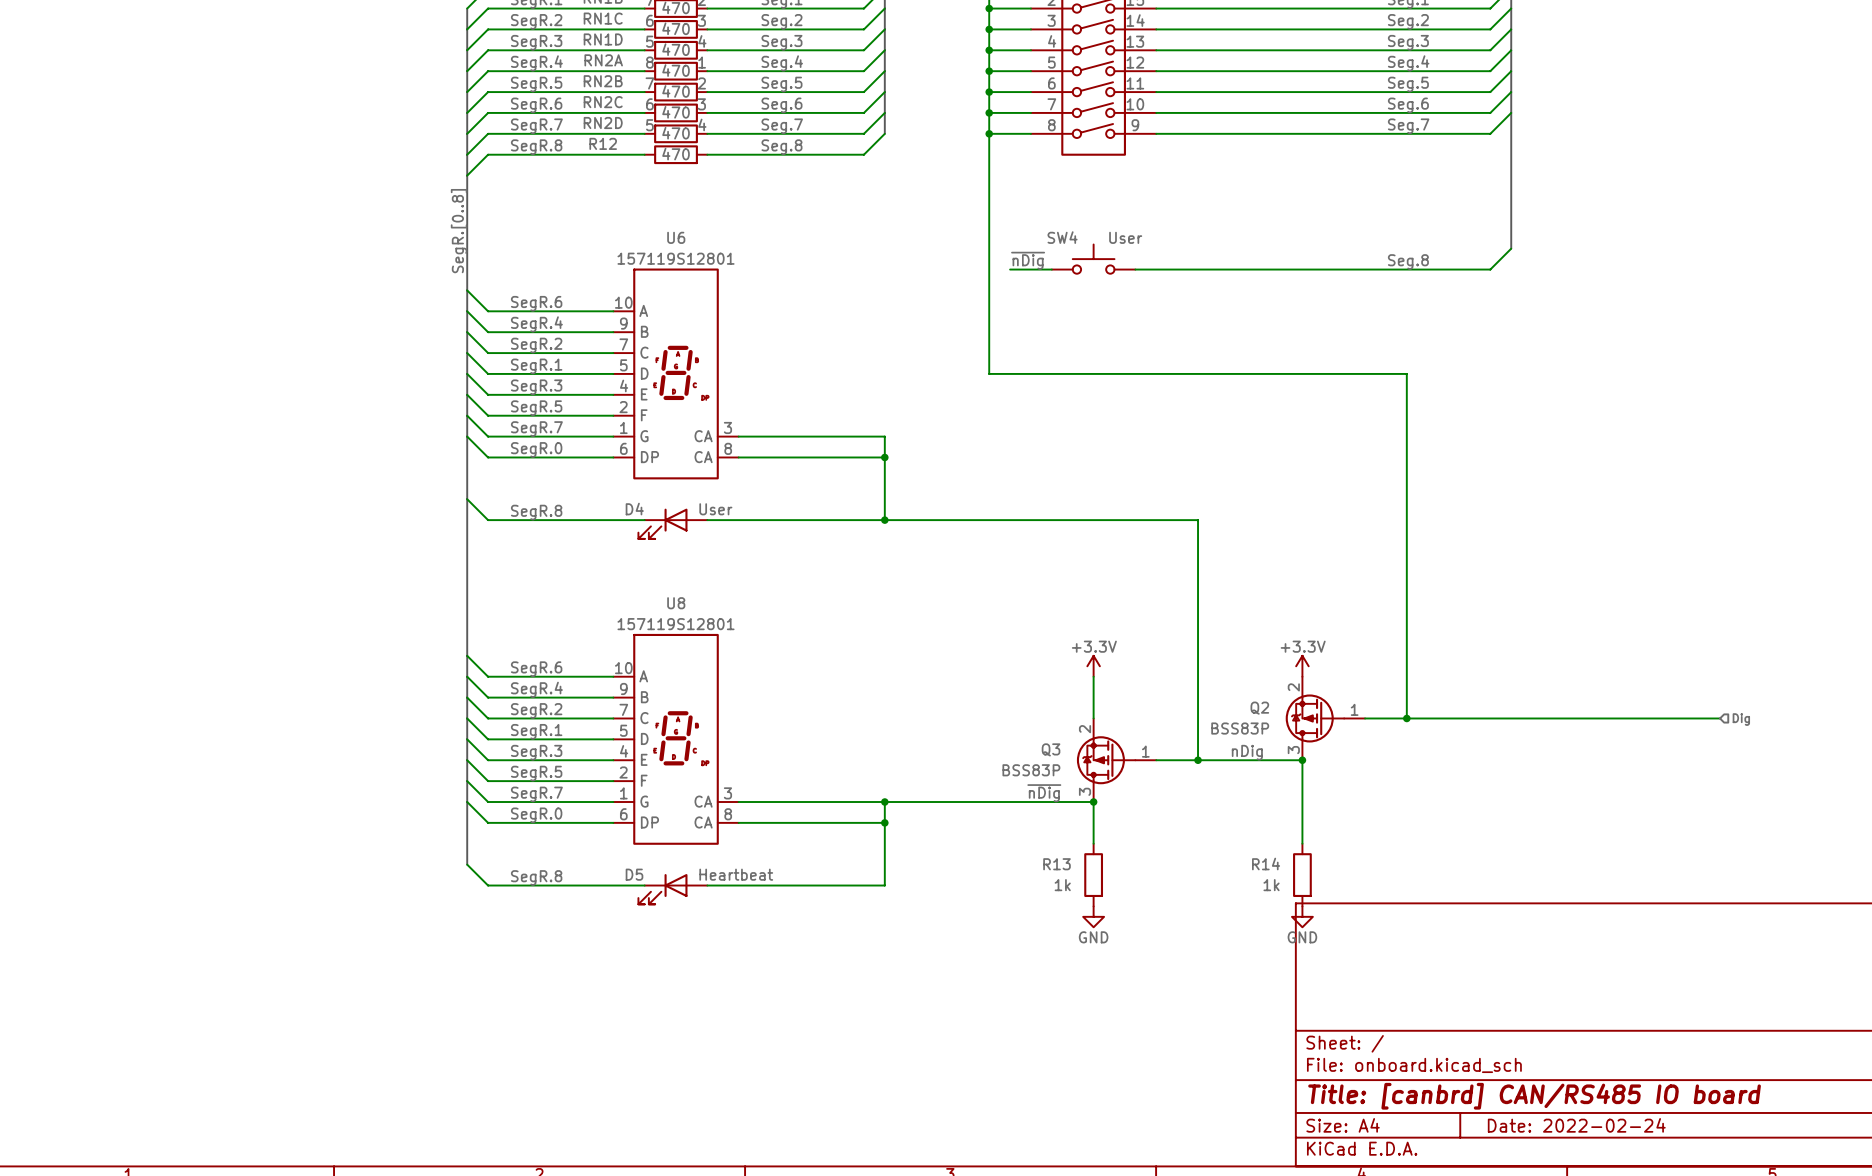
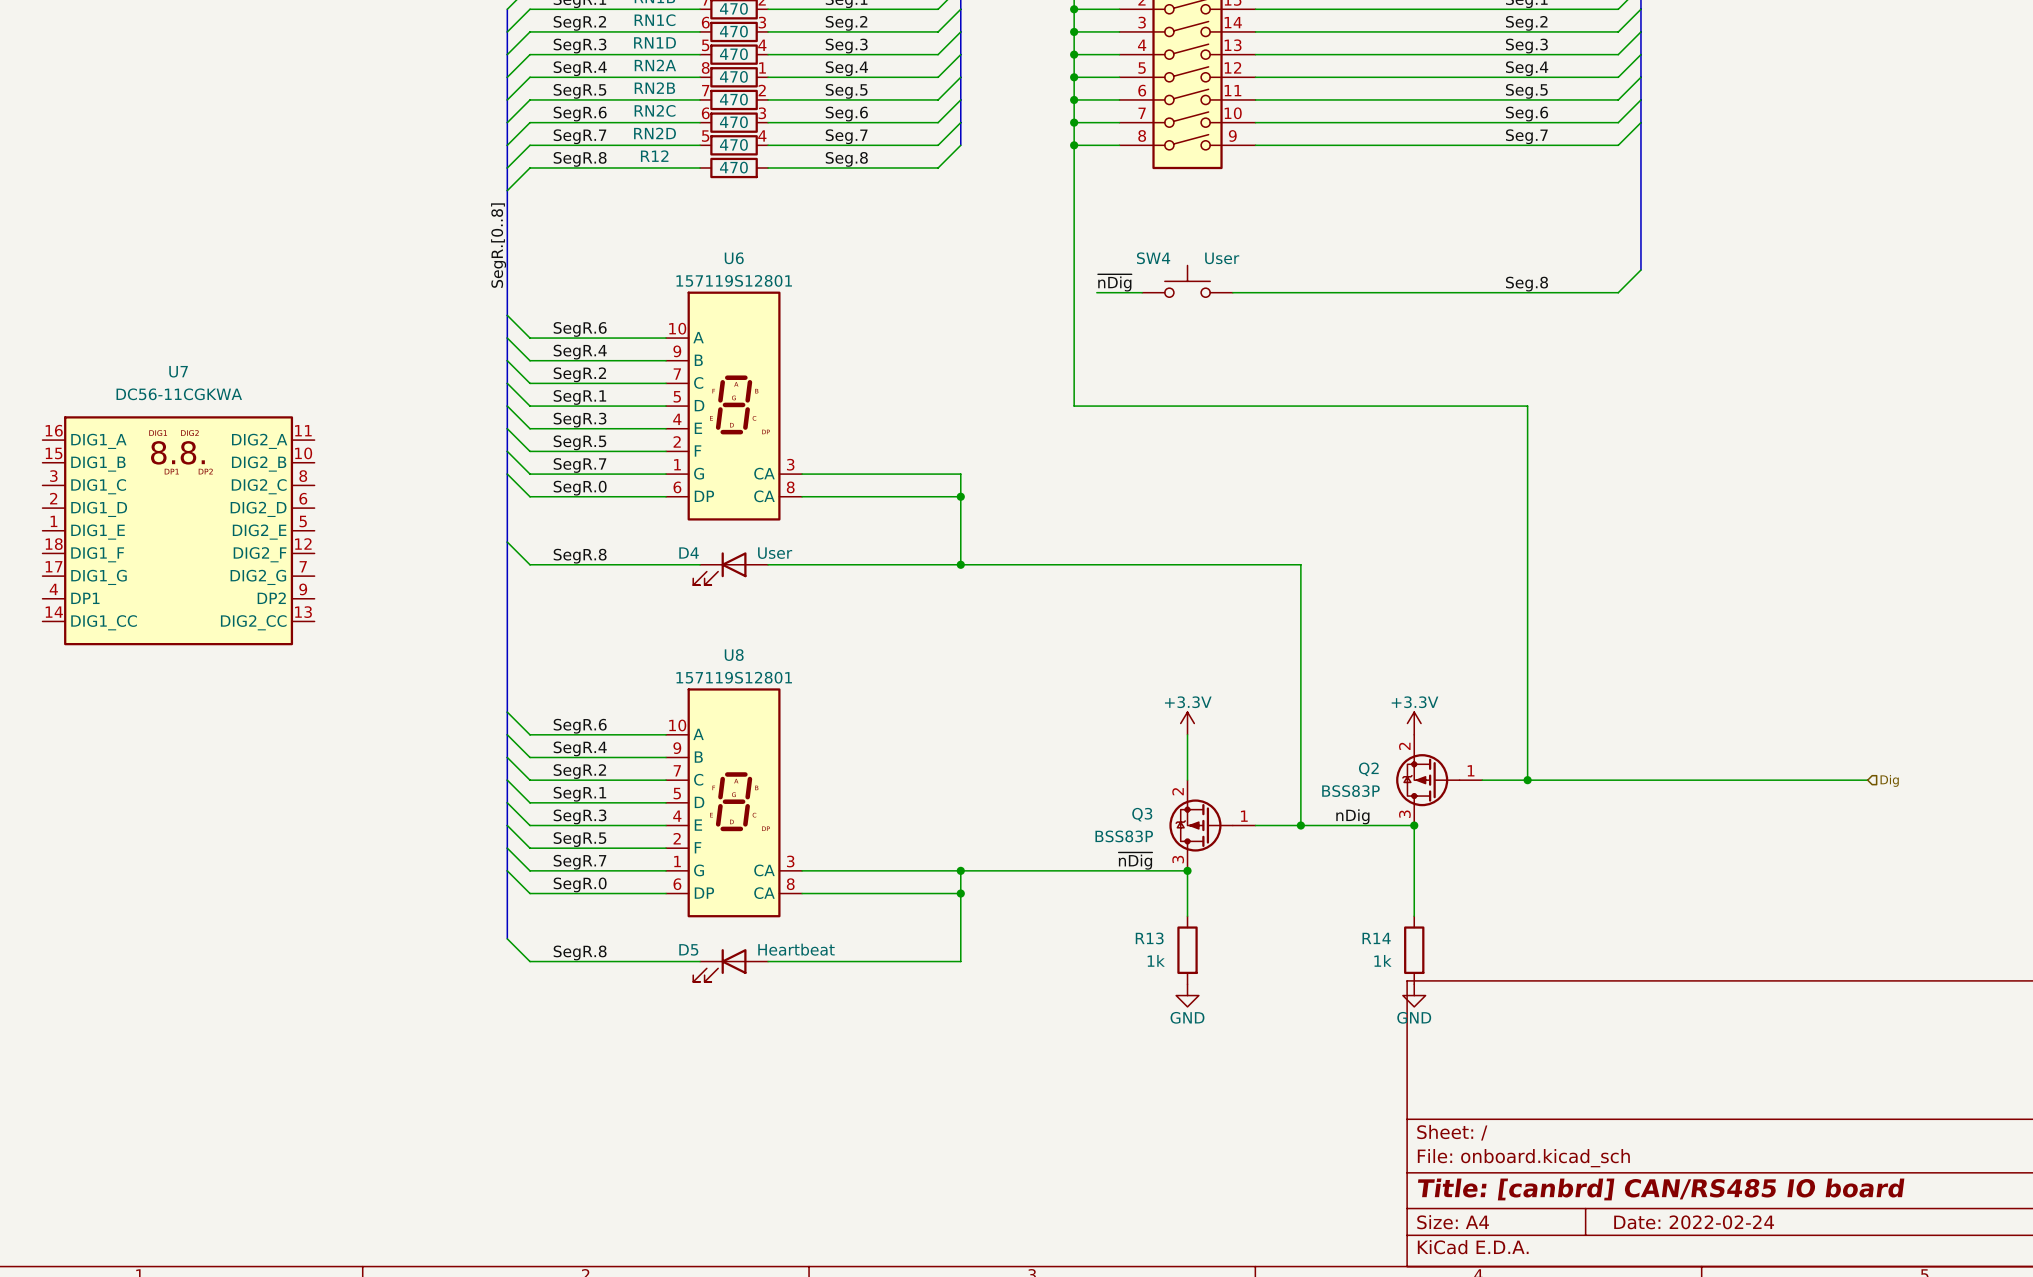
U7: none -> DC56-11CGKWA (178, 530)

